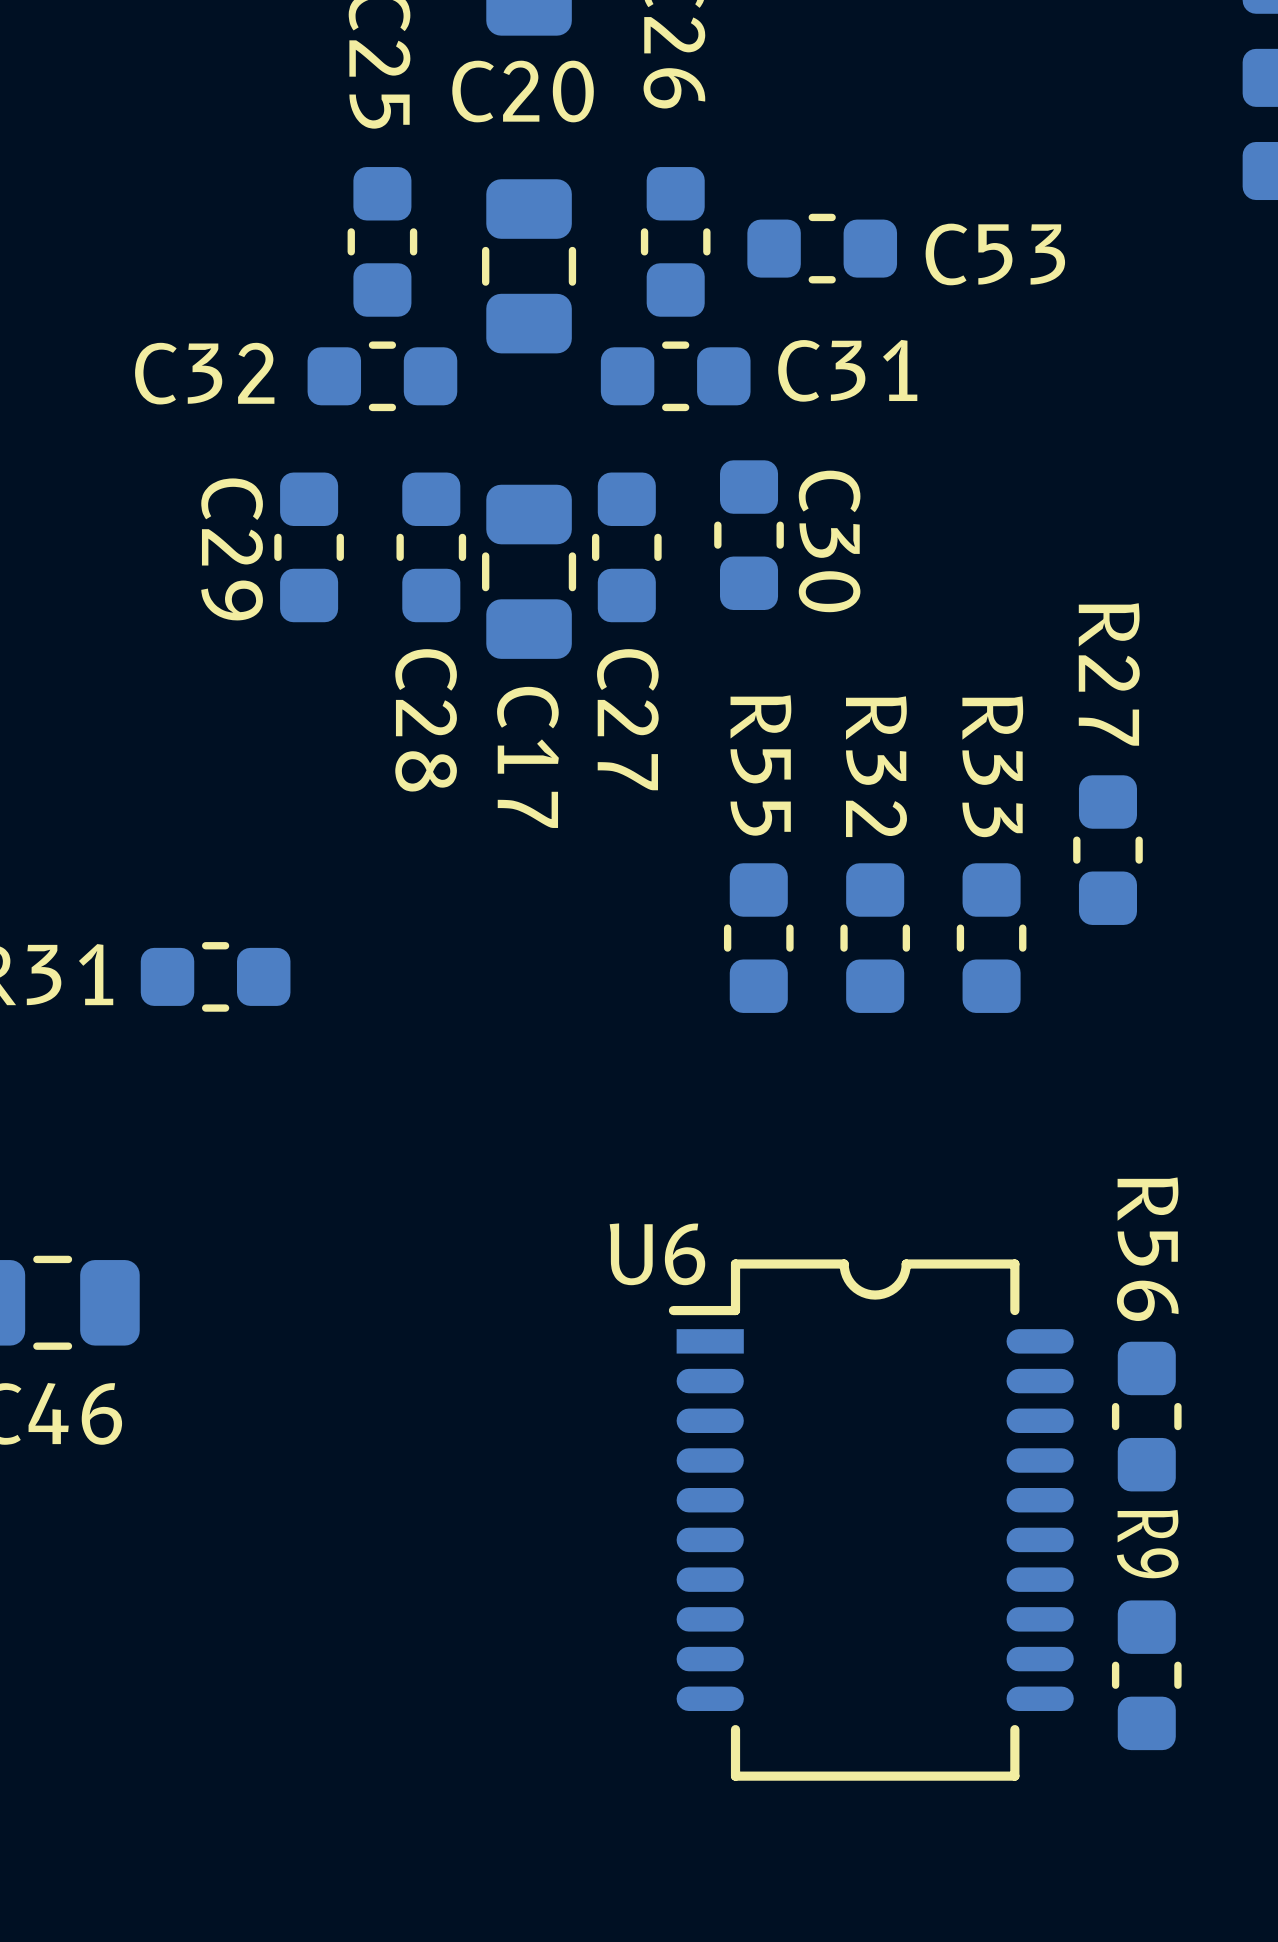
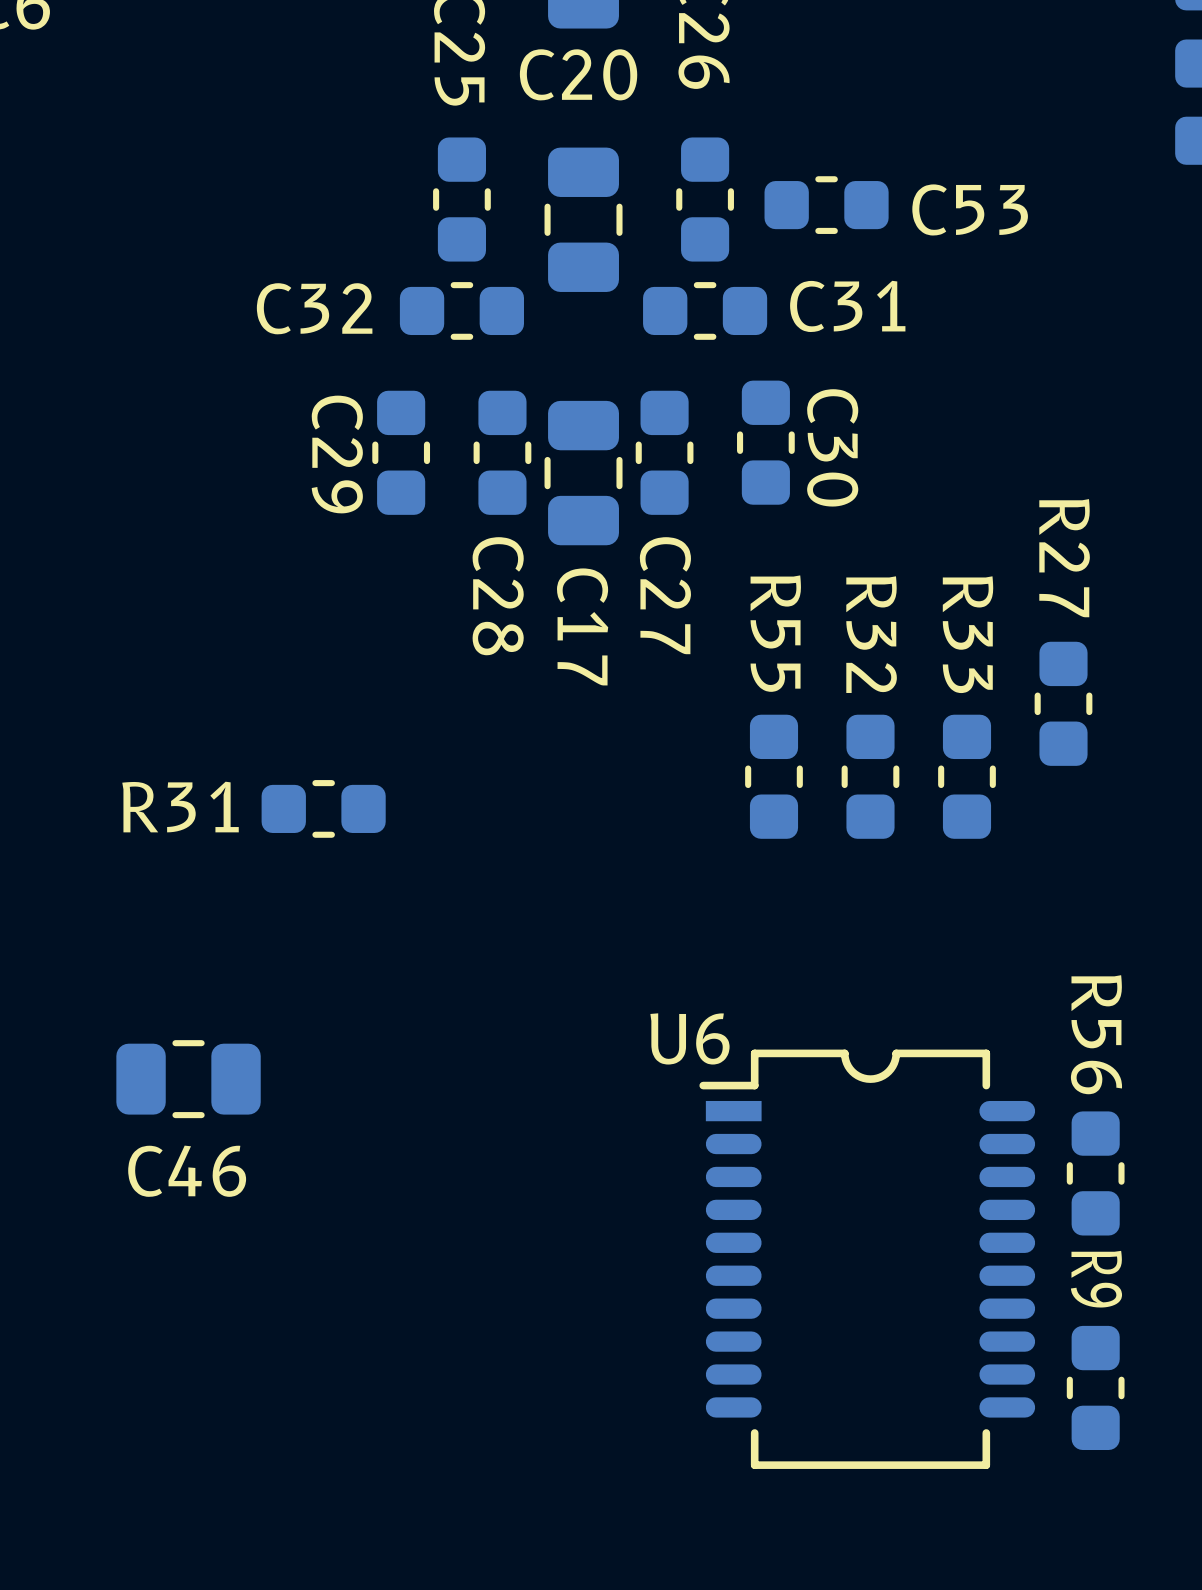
U6 footprint: [668, 1259, 1074, 1781] -> [699, 1049, 1036, 1469]

